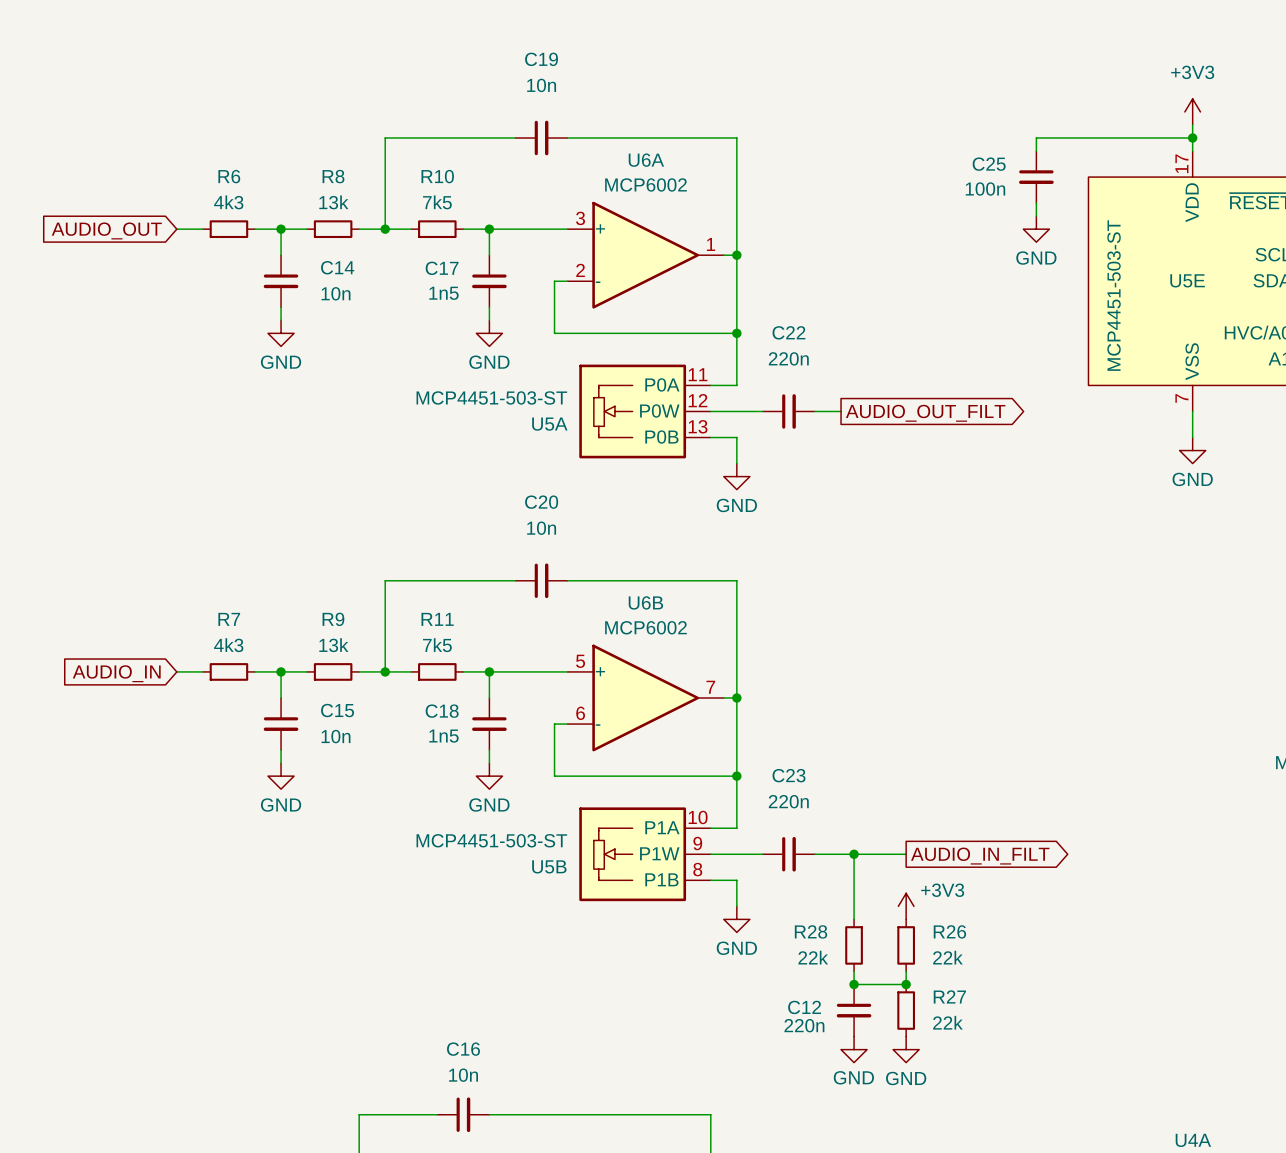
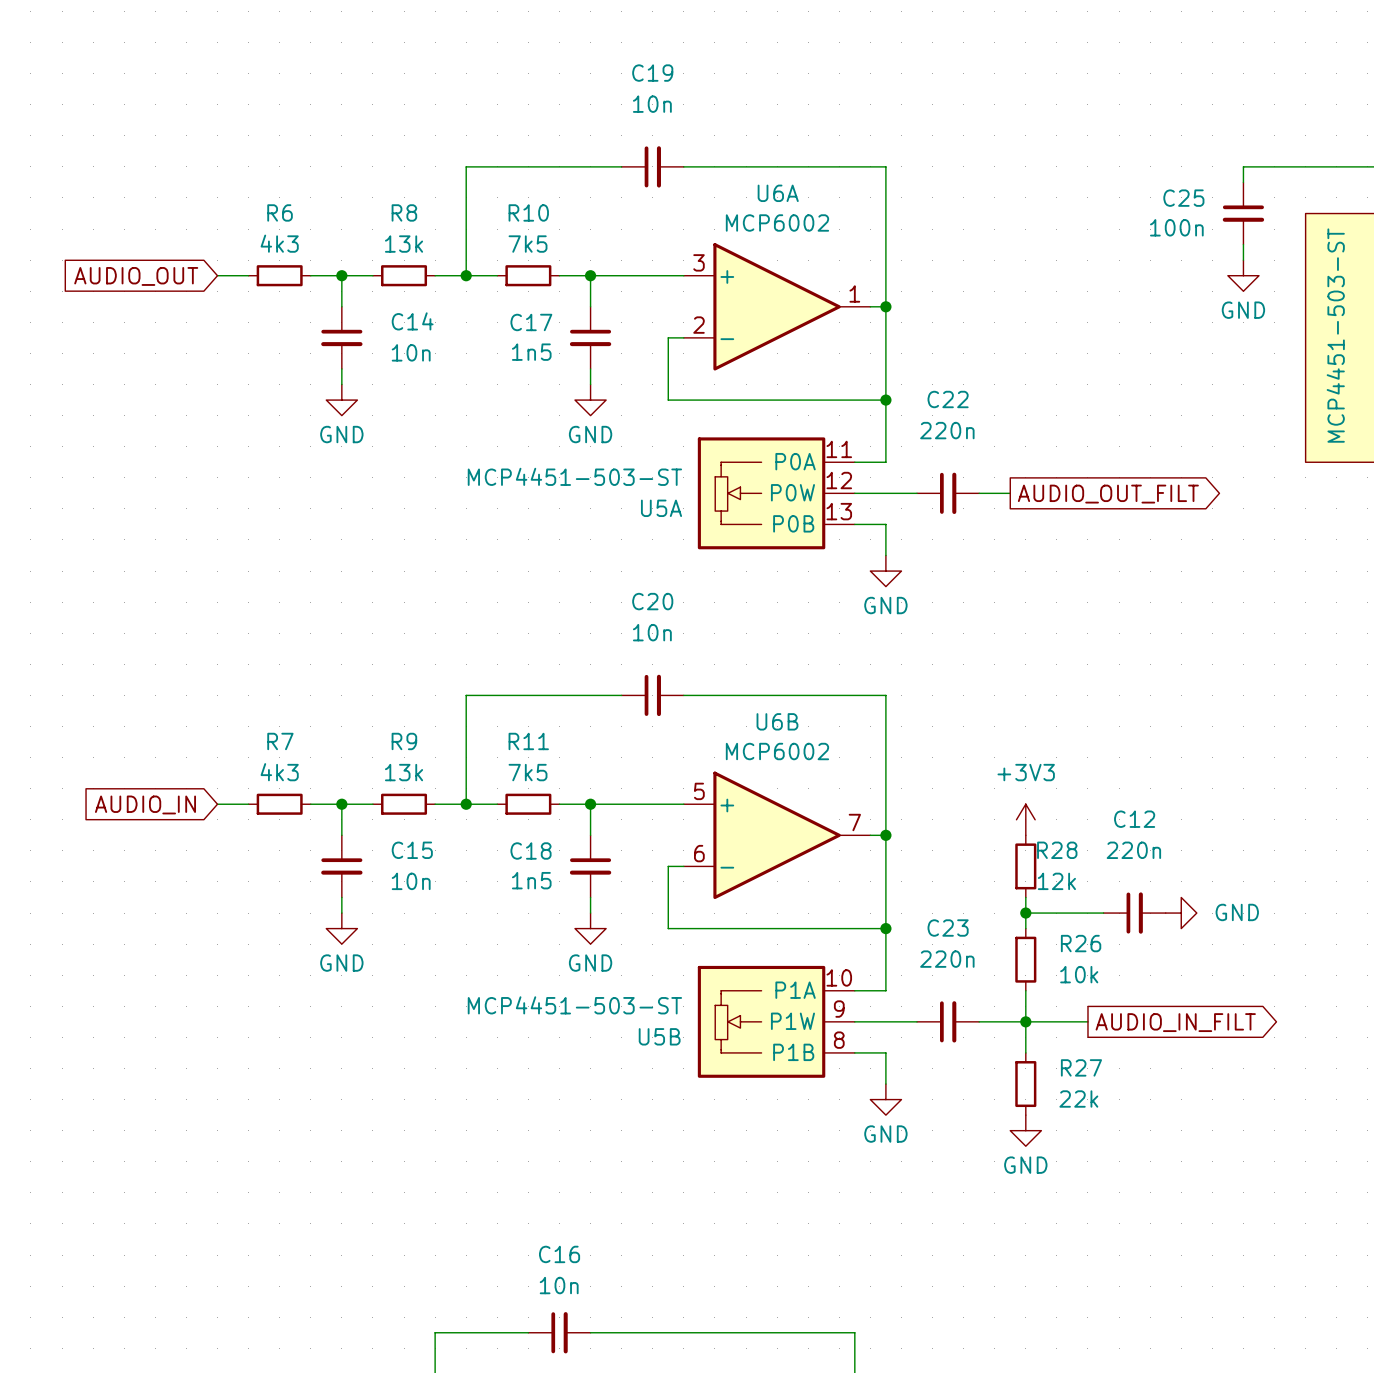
wire: none -> (1025, 897) (1025, 928)
wire: none -> (1025, 913) (1103, 913)
junction: none -> (1025, 913)
power symbol: none -> GND (1181, 913)
wire: none -> (1025, 990) (1025, 1021)
wire: (854, 880) (854, 919) -> none
power symbol text position: +3V3 (942, 890) -> +3V3 (1026, 772)
power symbol position: +3V3 (906, 906) -> +3V3 (1025, 819)
R28 name position: R28 (811, 931) -> R28 (1057, 850)
power symbol: none -> GND (1025, 1130)
R28 position: (854, 945) -> (1025, 866)
R26 position: (906, 945) -> (1025, 959)
R28 value: 22k (813, 957) -> 12k (1056, 881)
R26 value: 22k (947, 957) -> 10k (1079, 974)
wire: (854, 971) (854, 984) (906, 984) (906, 971) -> none
junction: (854, 984) -> none
junction: (906, 984) -> none
C12 name position: C12 (804, 1007) -> C12 (1134, 819)
C12 rotation: 0° (854, 1010) -> 90° counterclockwise (1134, 913)
C12 position: (854, 1010) -> (1134, 913)
R27 position: (906, 1010) -> (1025, 1084)
C12 value position: 220n (804, 1025) -> 220n (1133, 850)
power symbol: GND (854, 1049) -> none
power symbol: GND (906, 1049) -> none

